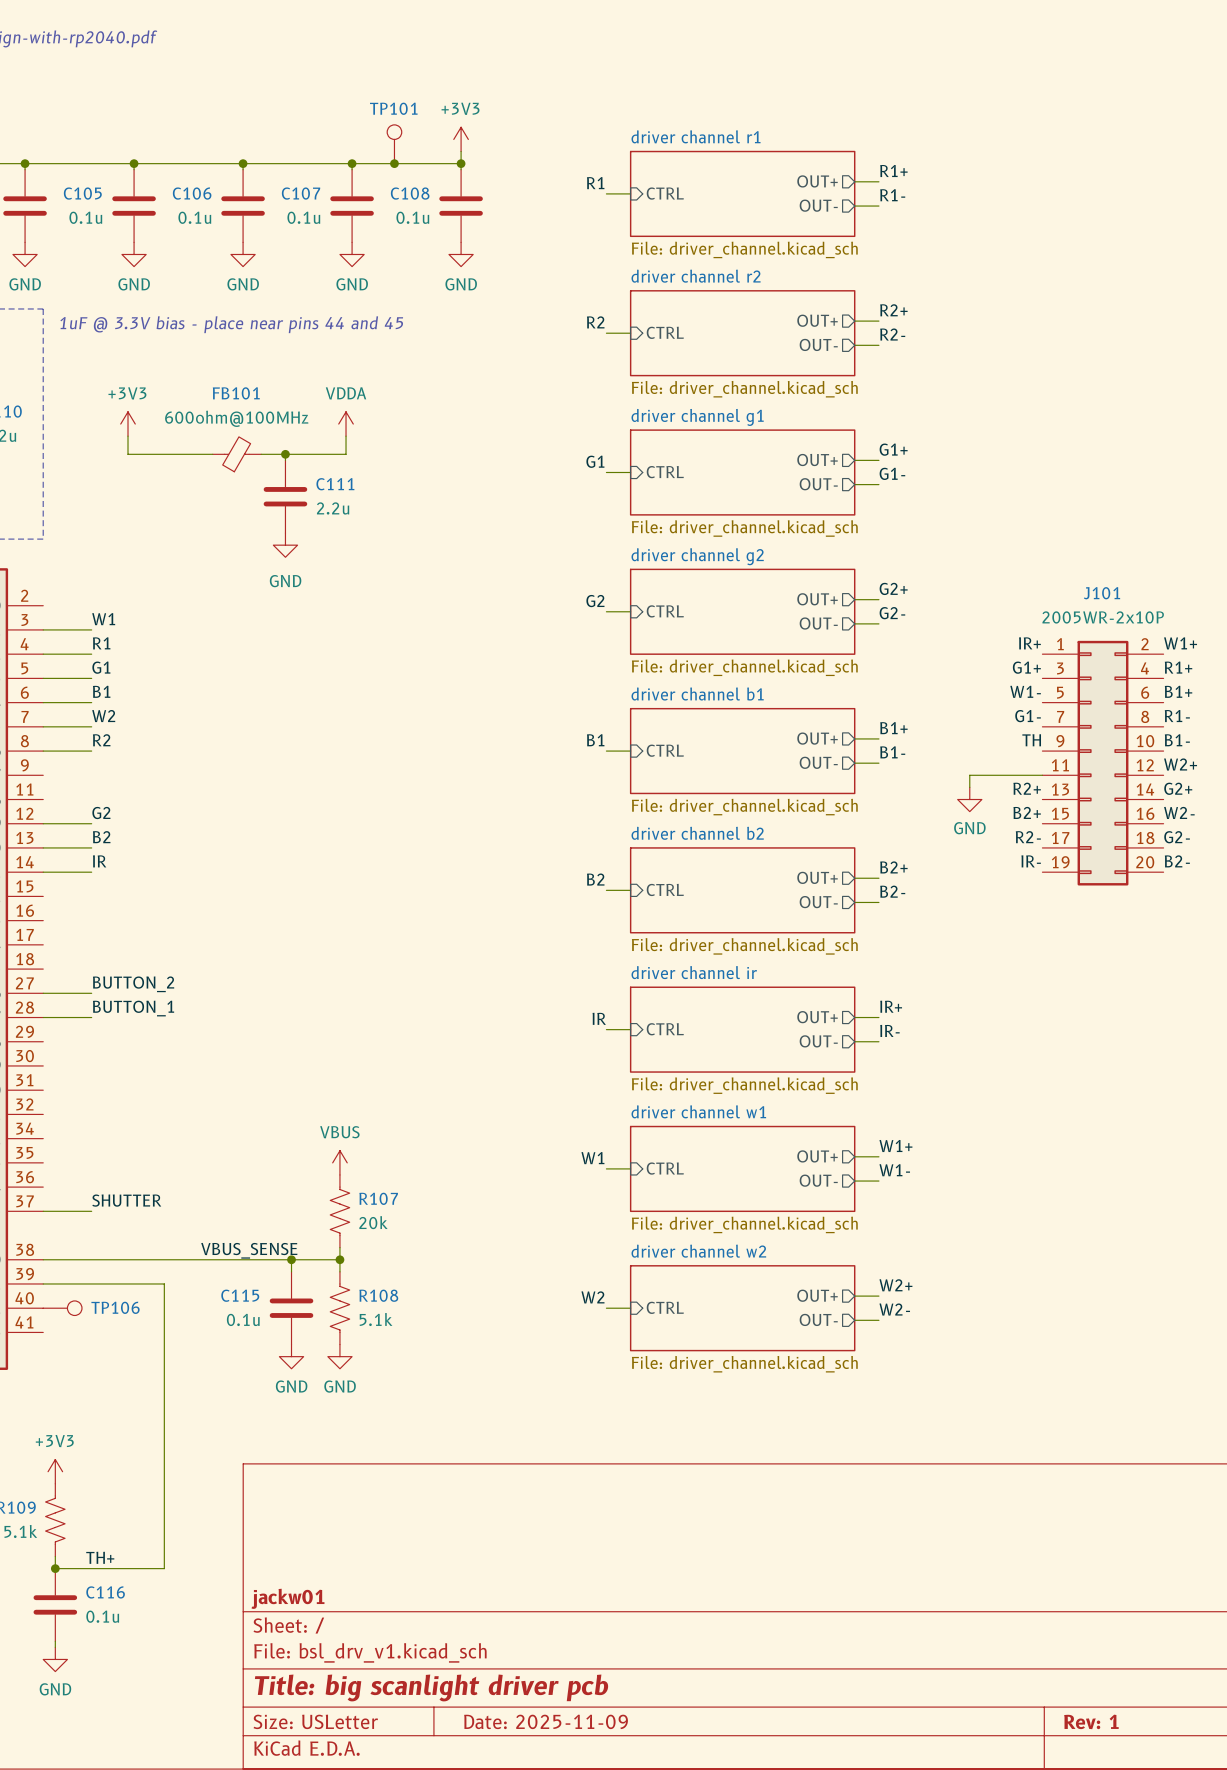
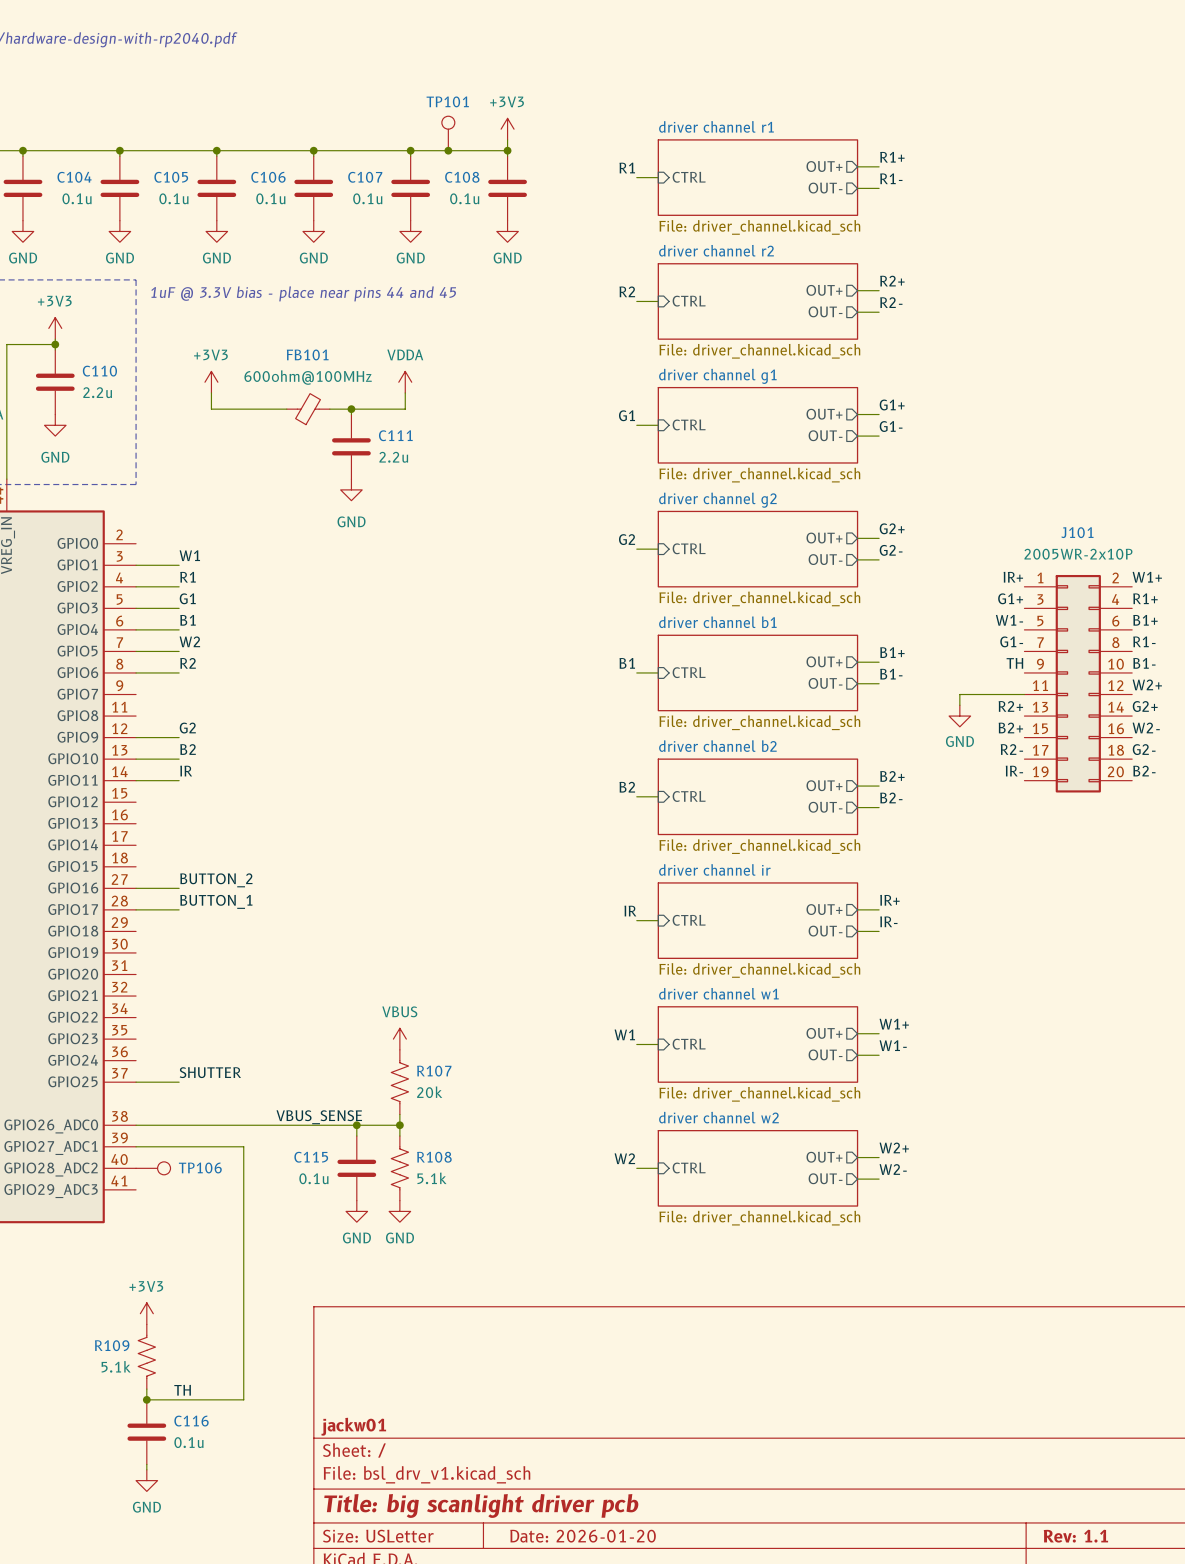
label: TH+ (100, 1557) -> TH (182, 1390)
title block: Date: 2025-11-09 (546, 1721) -> Date: 2026-01-20 (583, 1536)
title block: Rev: 1 (1091, 1721) -> Rev: 1.1 (1075, 1536)

